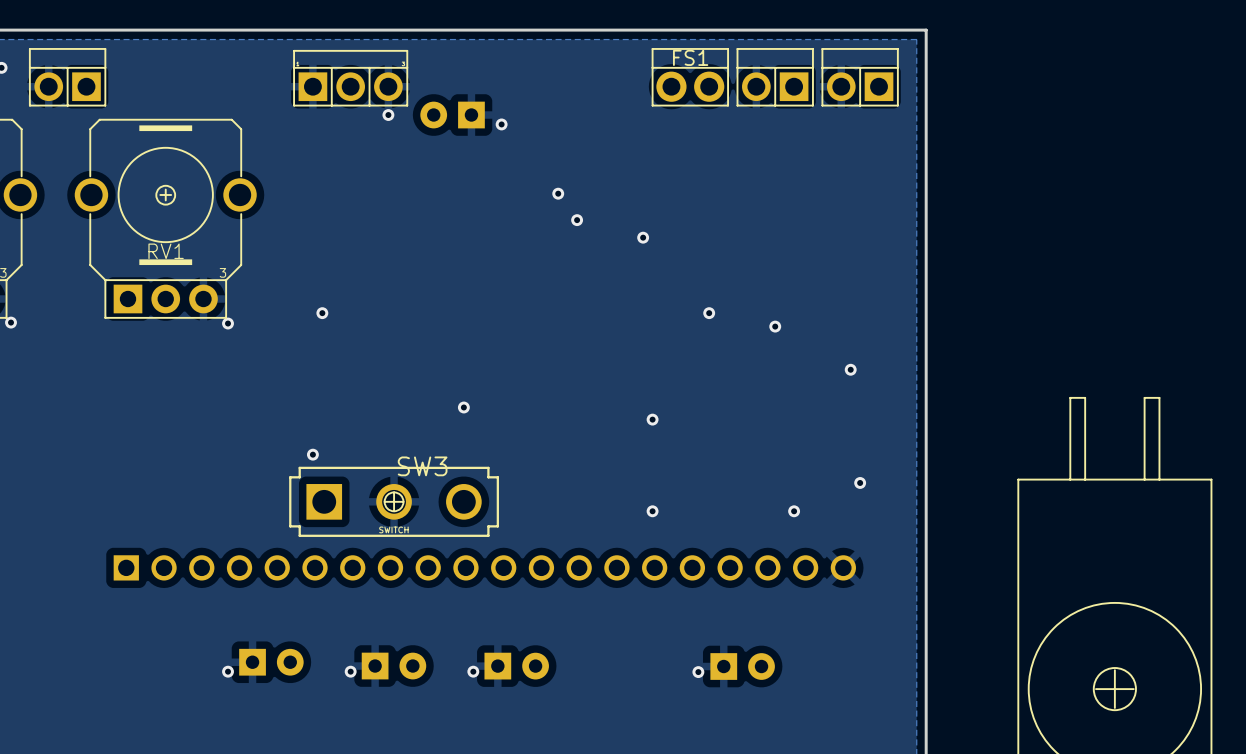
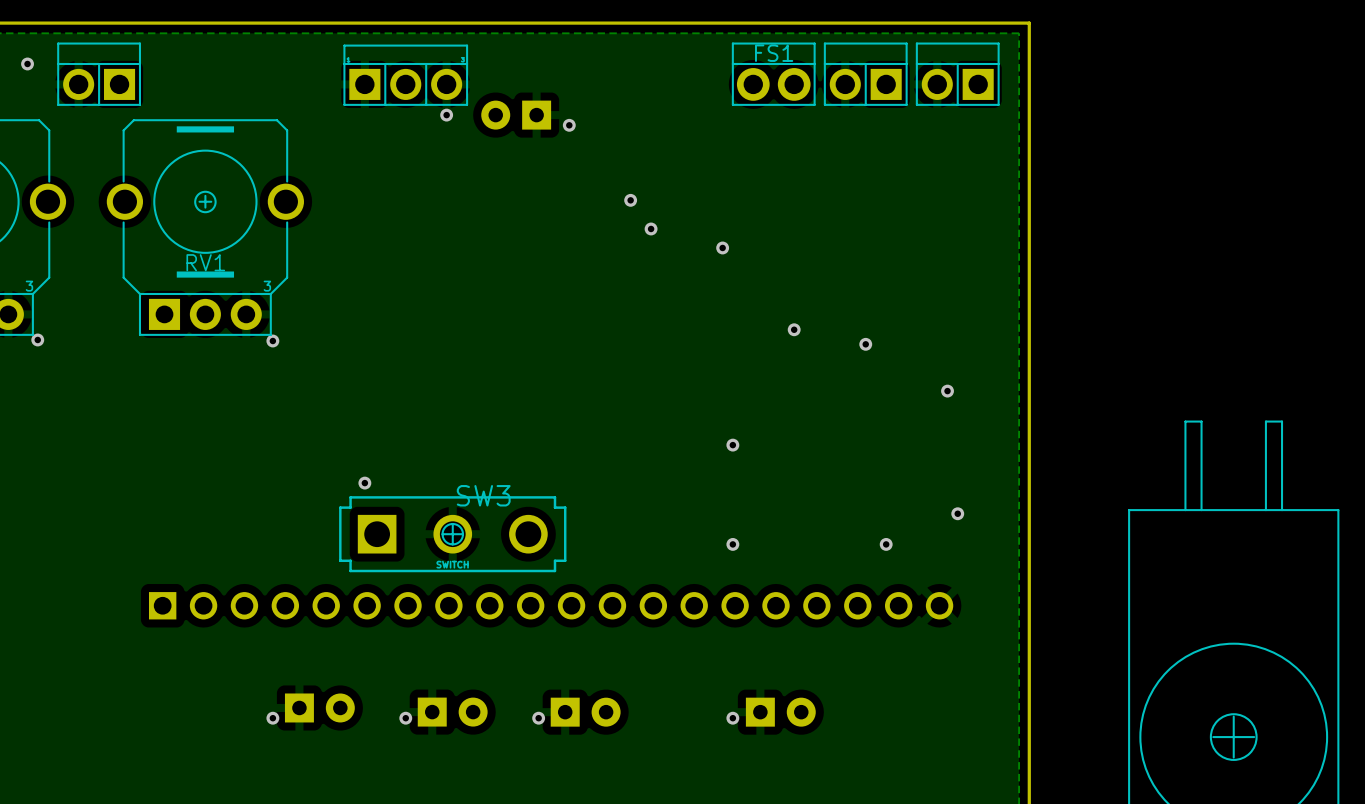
via: (322, 313) -> none
via: (463, 407) -> none
part position: (742, 666) -> (780, 712)
via position: (698, 672) -> (732, 718)

